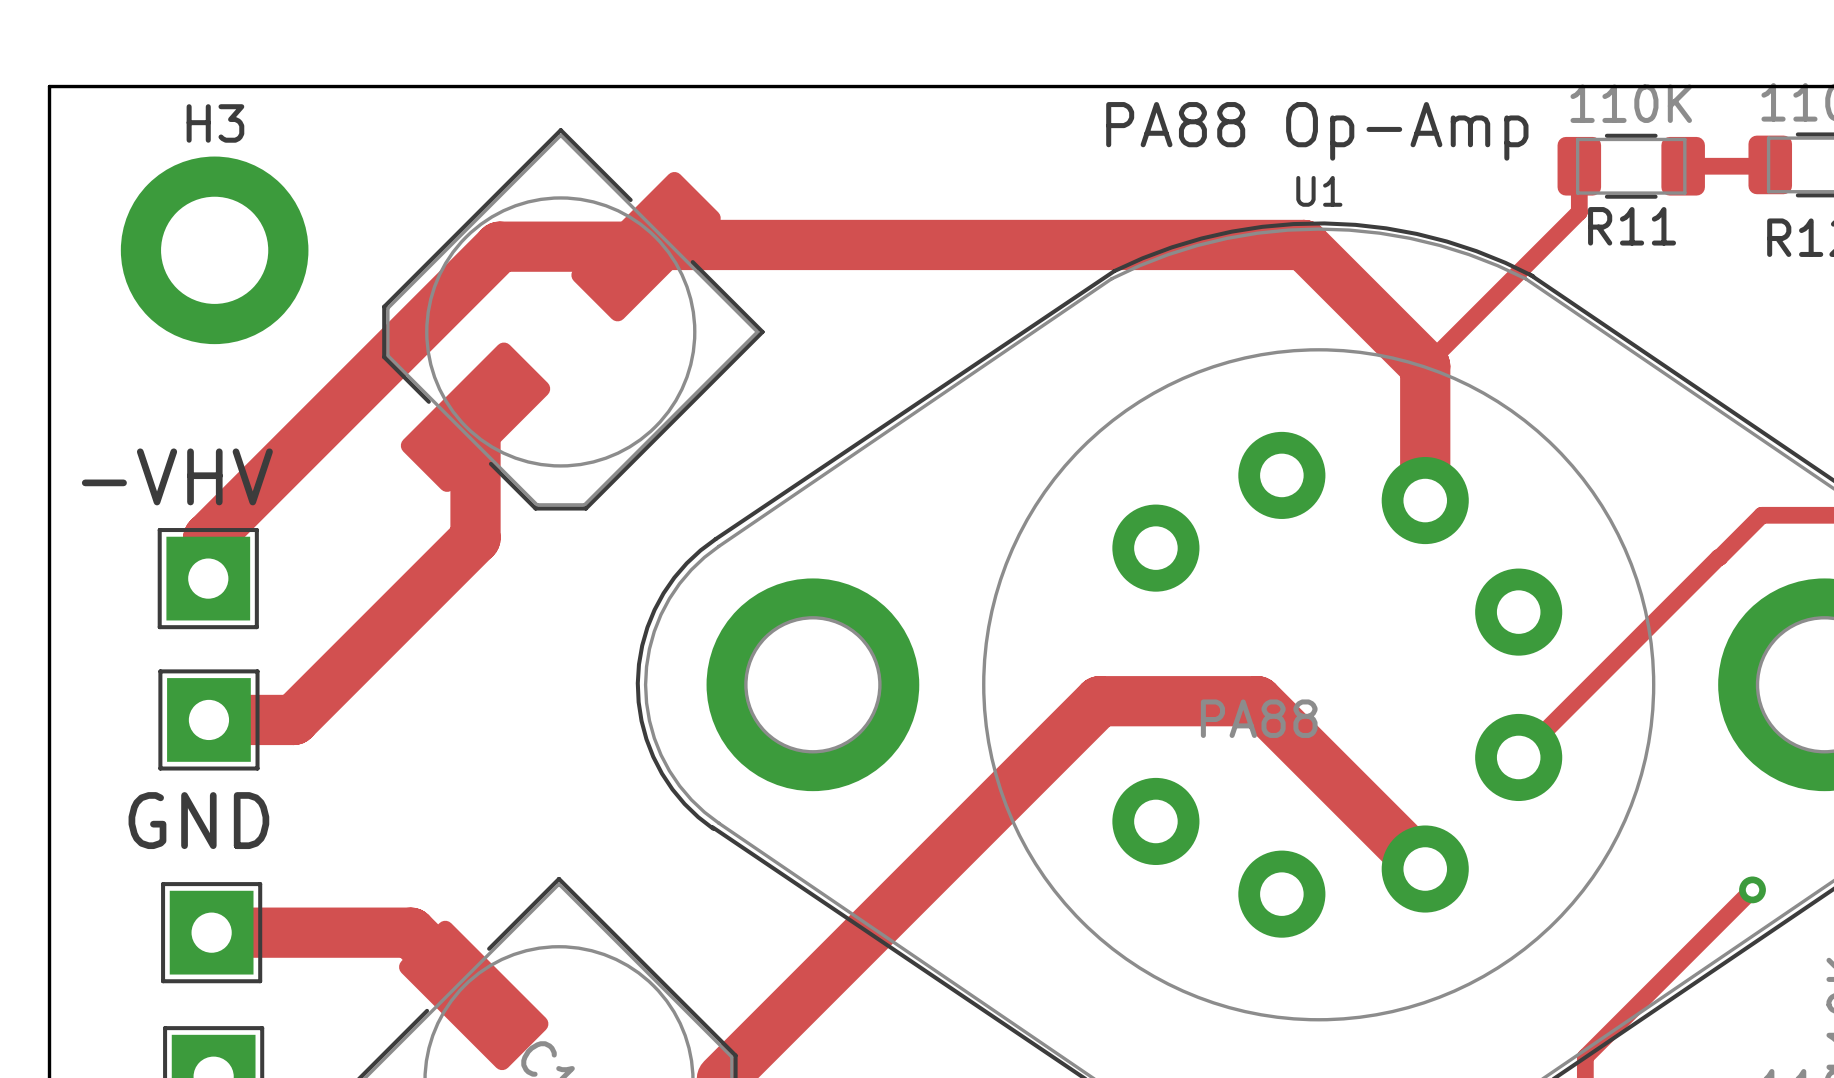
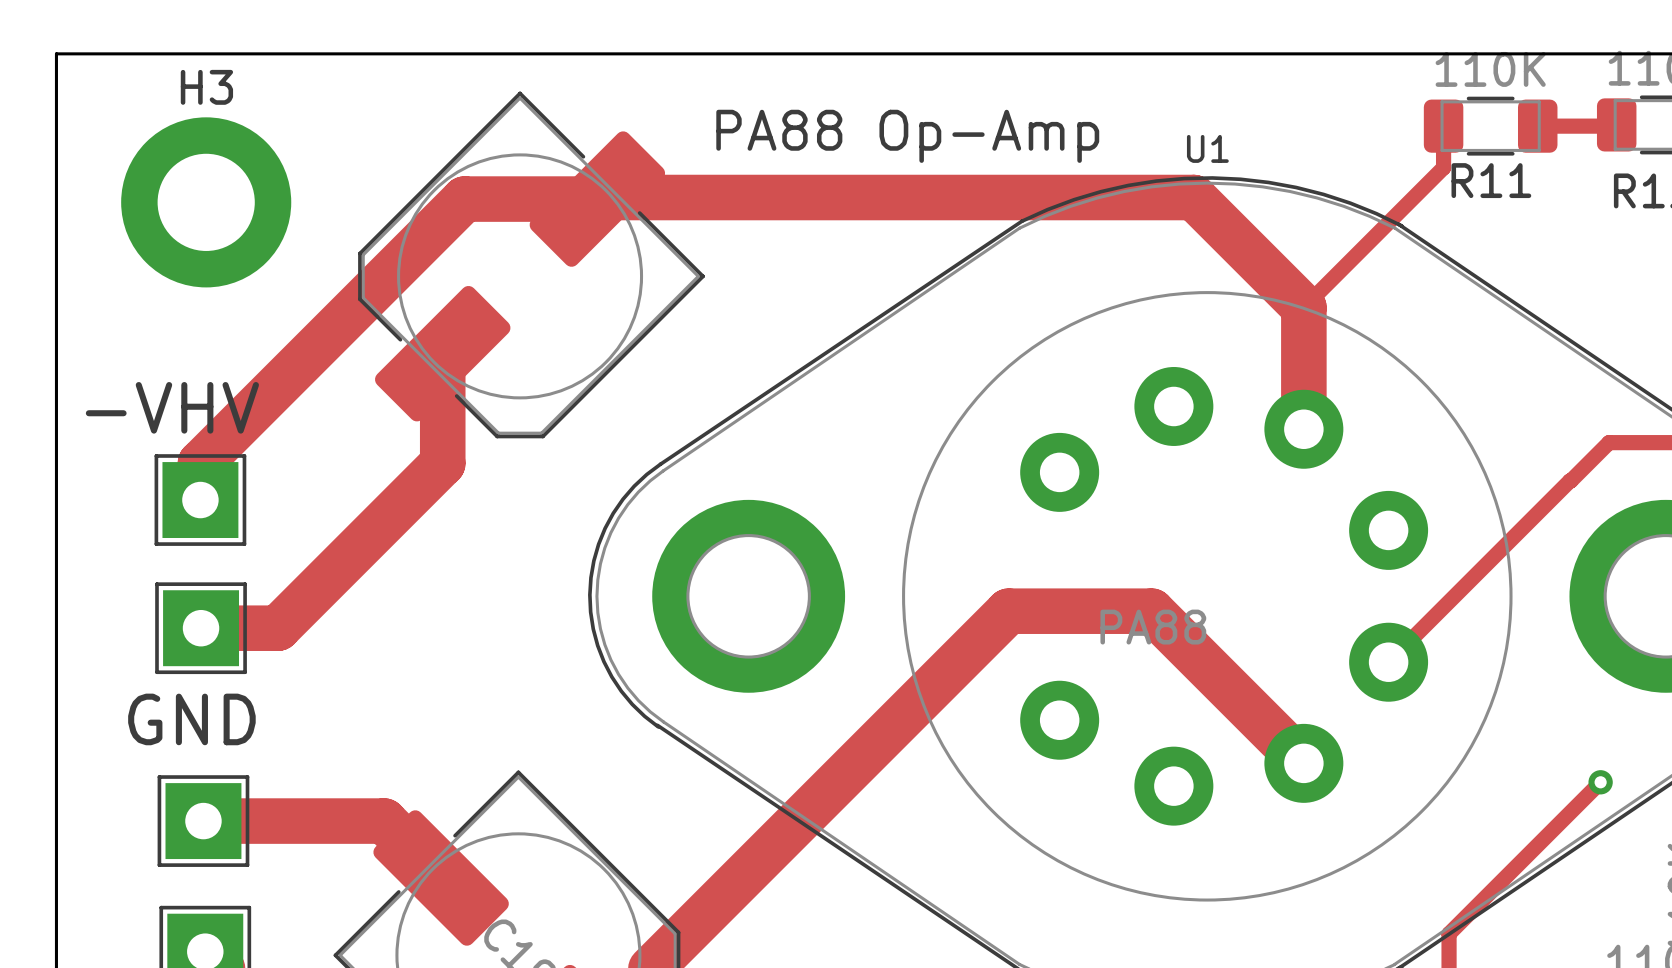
text position: PA88 Op-Amp (1317, 131) -> PA88 Op-Amp (907, 136)

